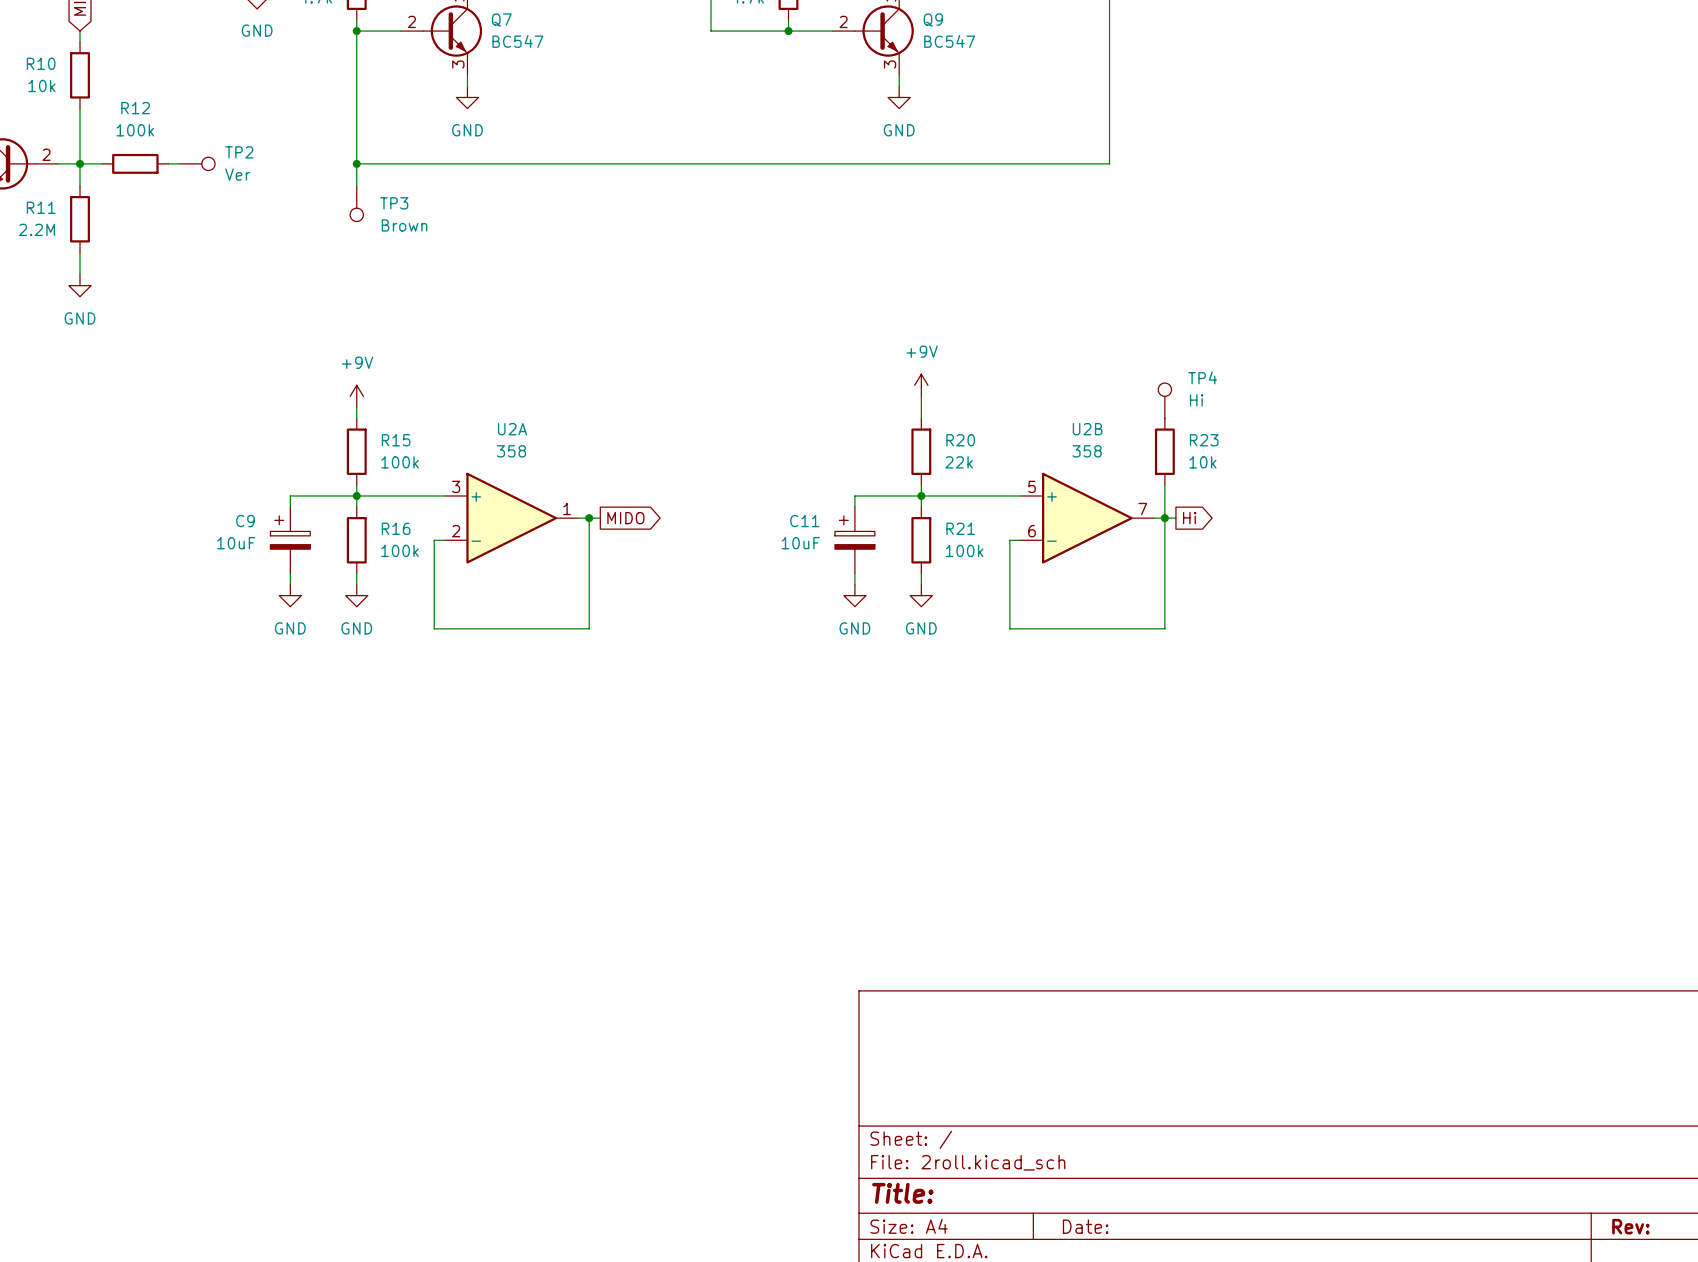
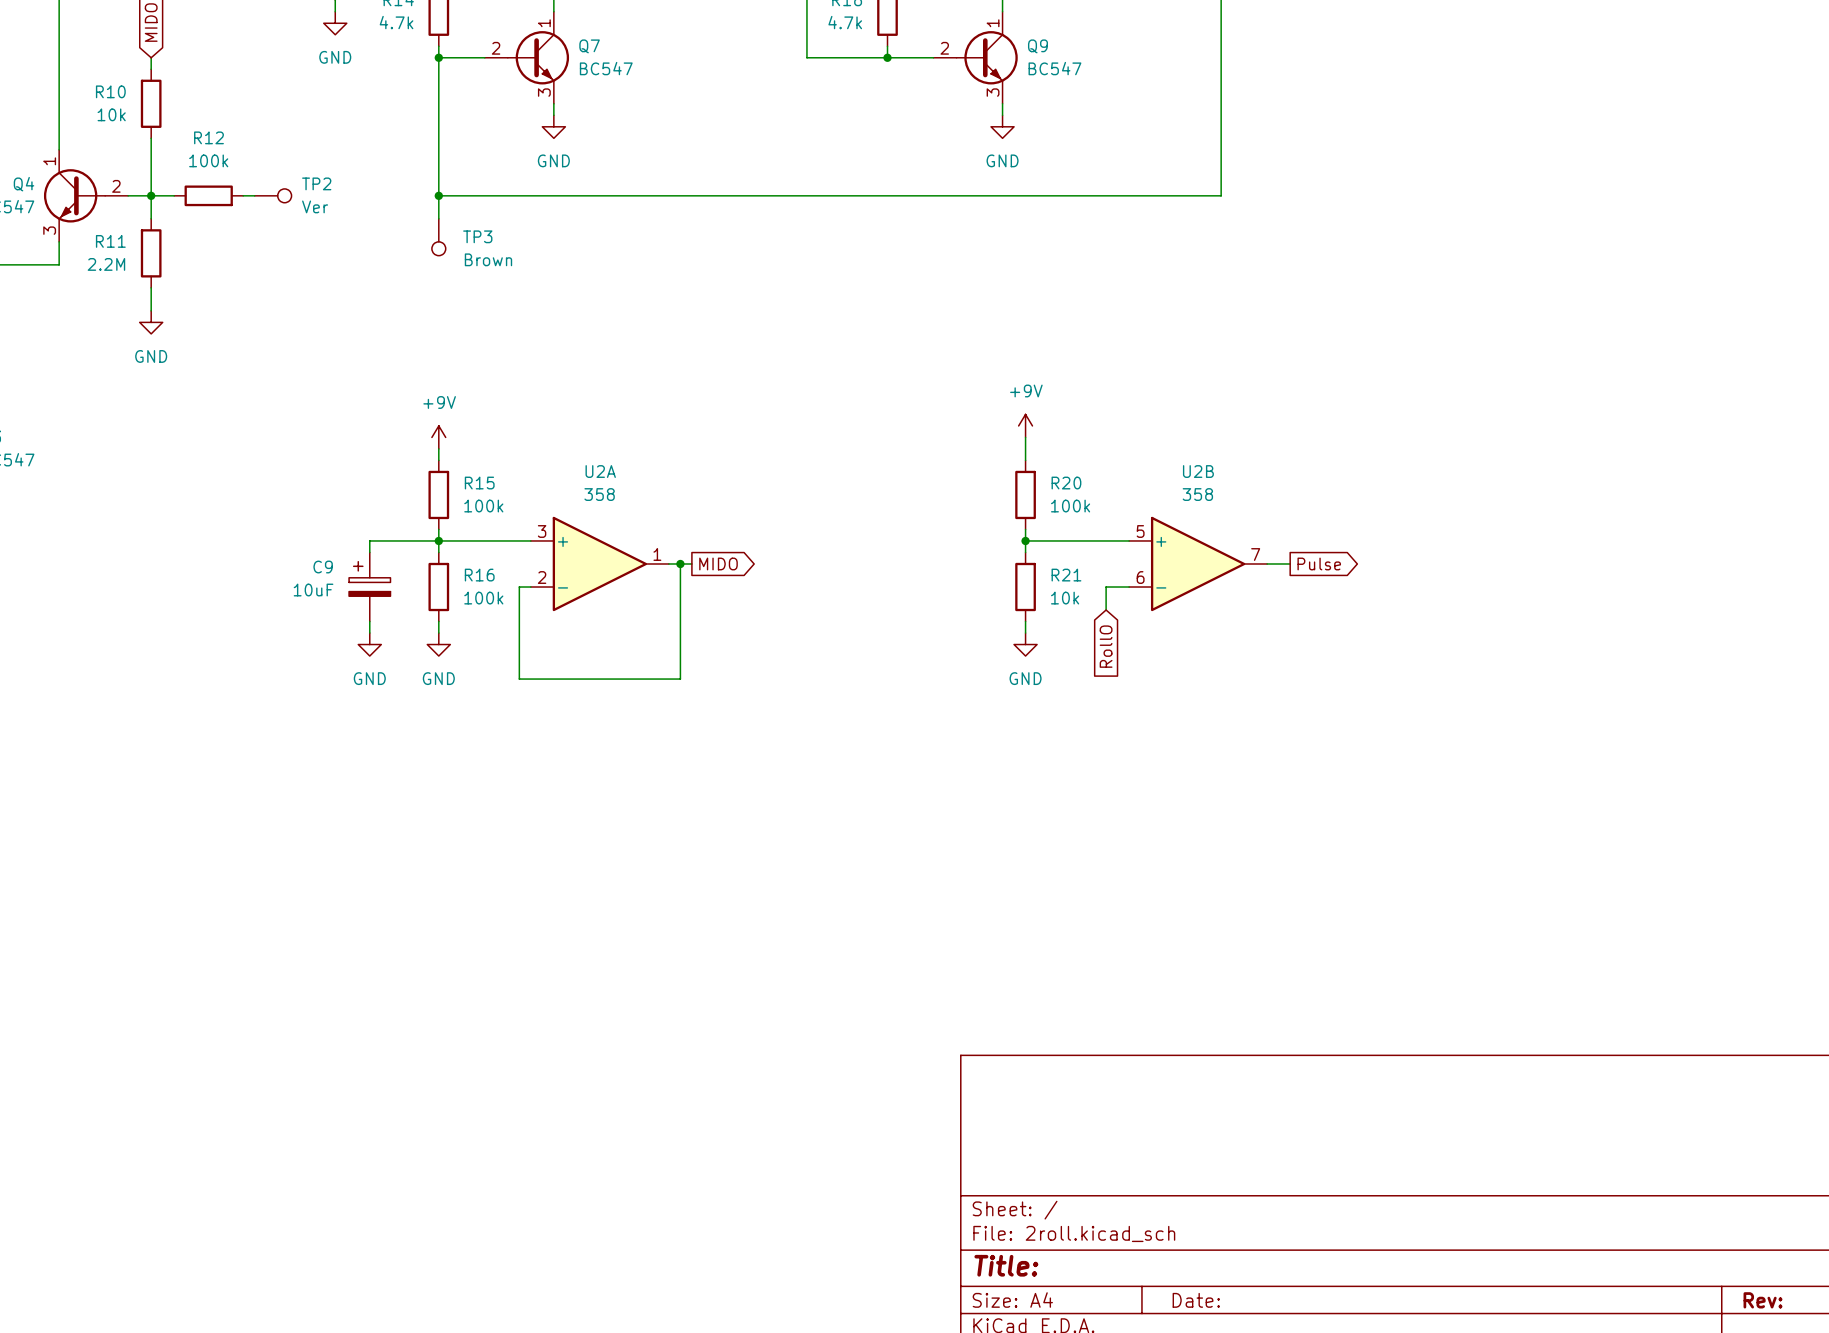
TP4: Hi (1164, 400) -> none
R23: 10k (1164, 451) -> none
R20 value: 22k (959, 462) -> 100k (1070, 506)
wire: (1164, 484) (1164, 628) (1009, 628) (1009, 540) -> (1106, 610) (1106, 587) (1117, 587)
wire: (921, 496) (854, 496) (854, 507) -> none
junction: (1164, 518) -> none
global label: Hi (1189, 518) -> Pulse (1319, 563)
C11: 10uF (854, 540) -> none
R21 value: 100k (964, 550) -> 10k (1065, 598)
wire: (854, 573) (854, 584) -> none
power symbol: GND (854, 595) -> none
global label: none -> RollO (1106, 646)

